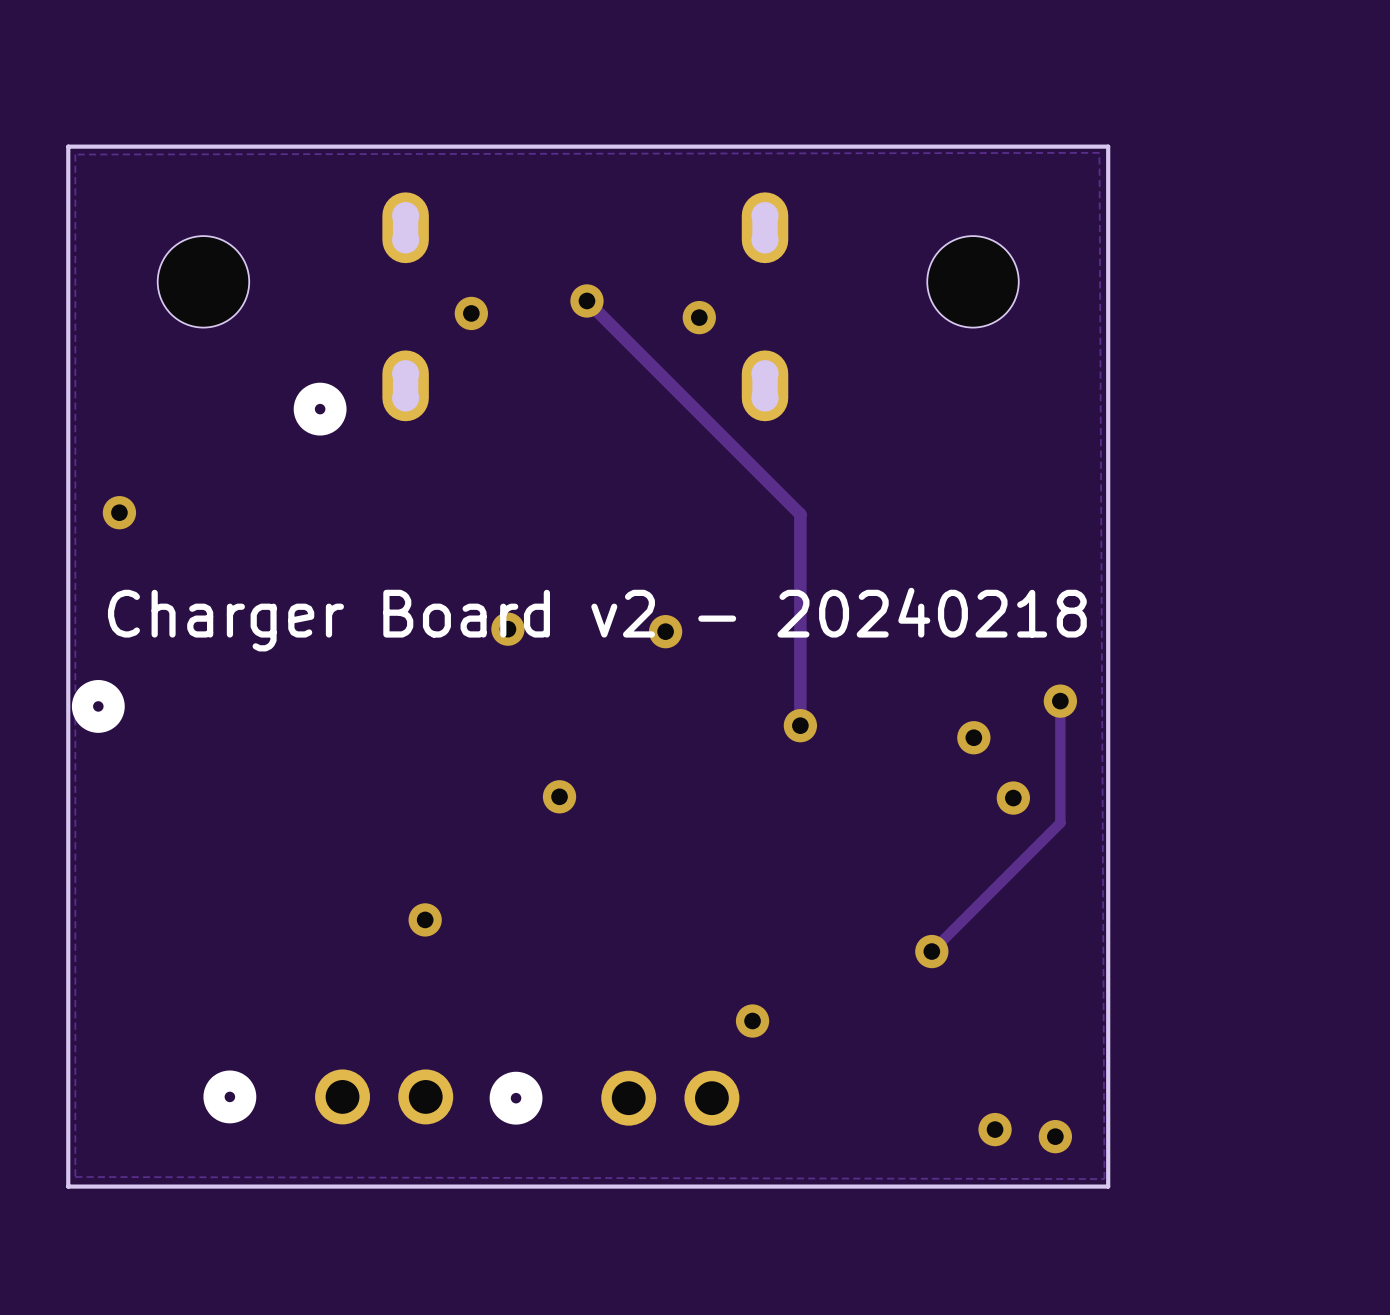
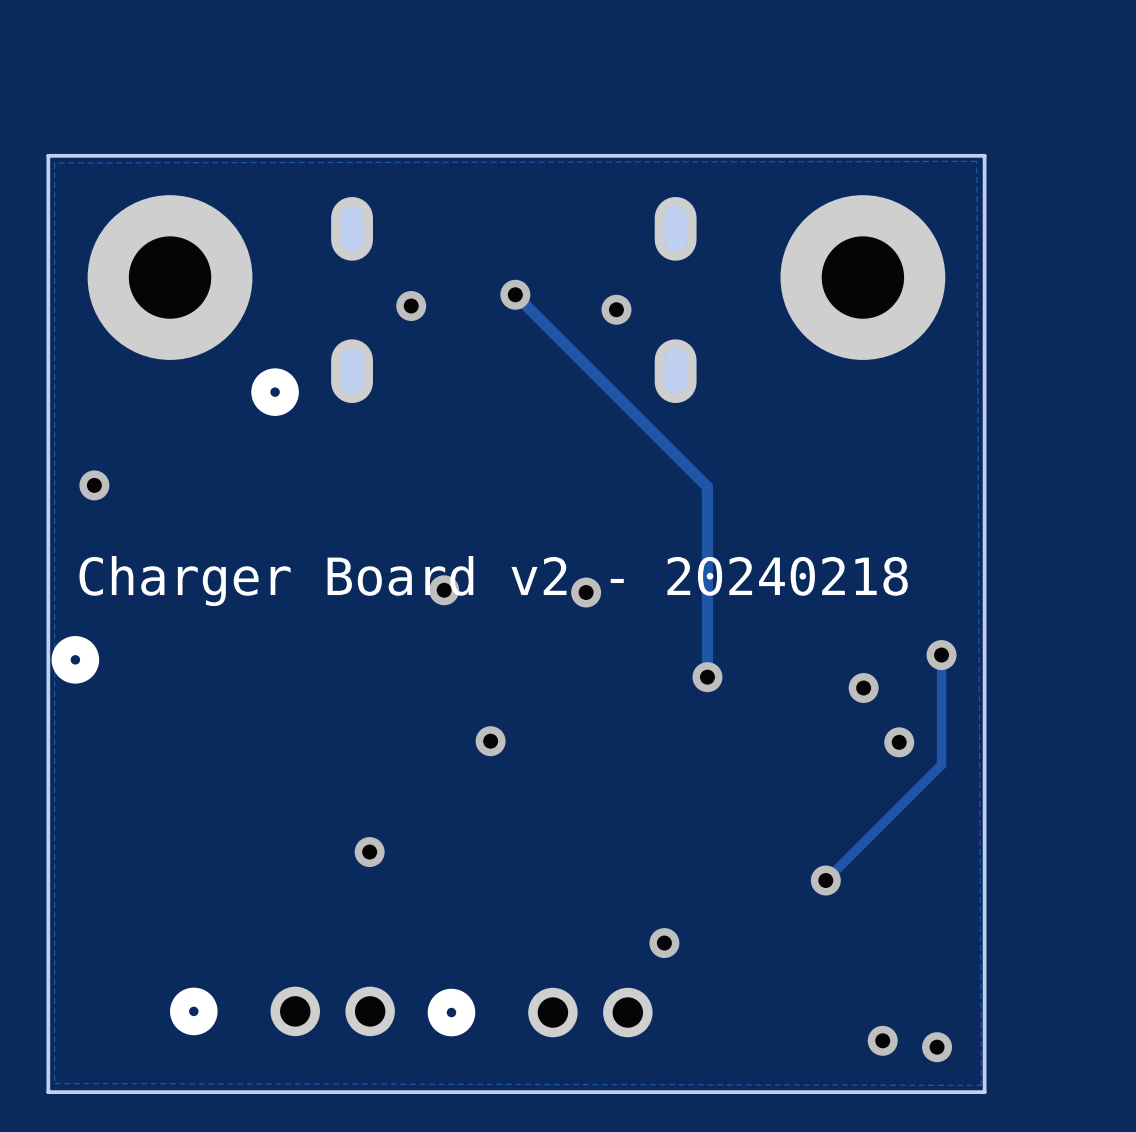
part footprint: [157, 236, 250, 328] -> [87, 195, 253, 360]
part footprint: [927, 236, 1019, 328] -> [780, 195, 946, 360]

